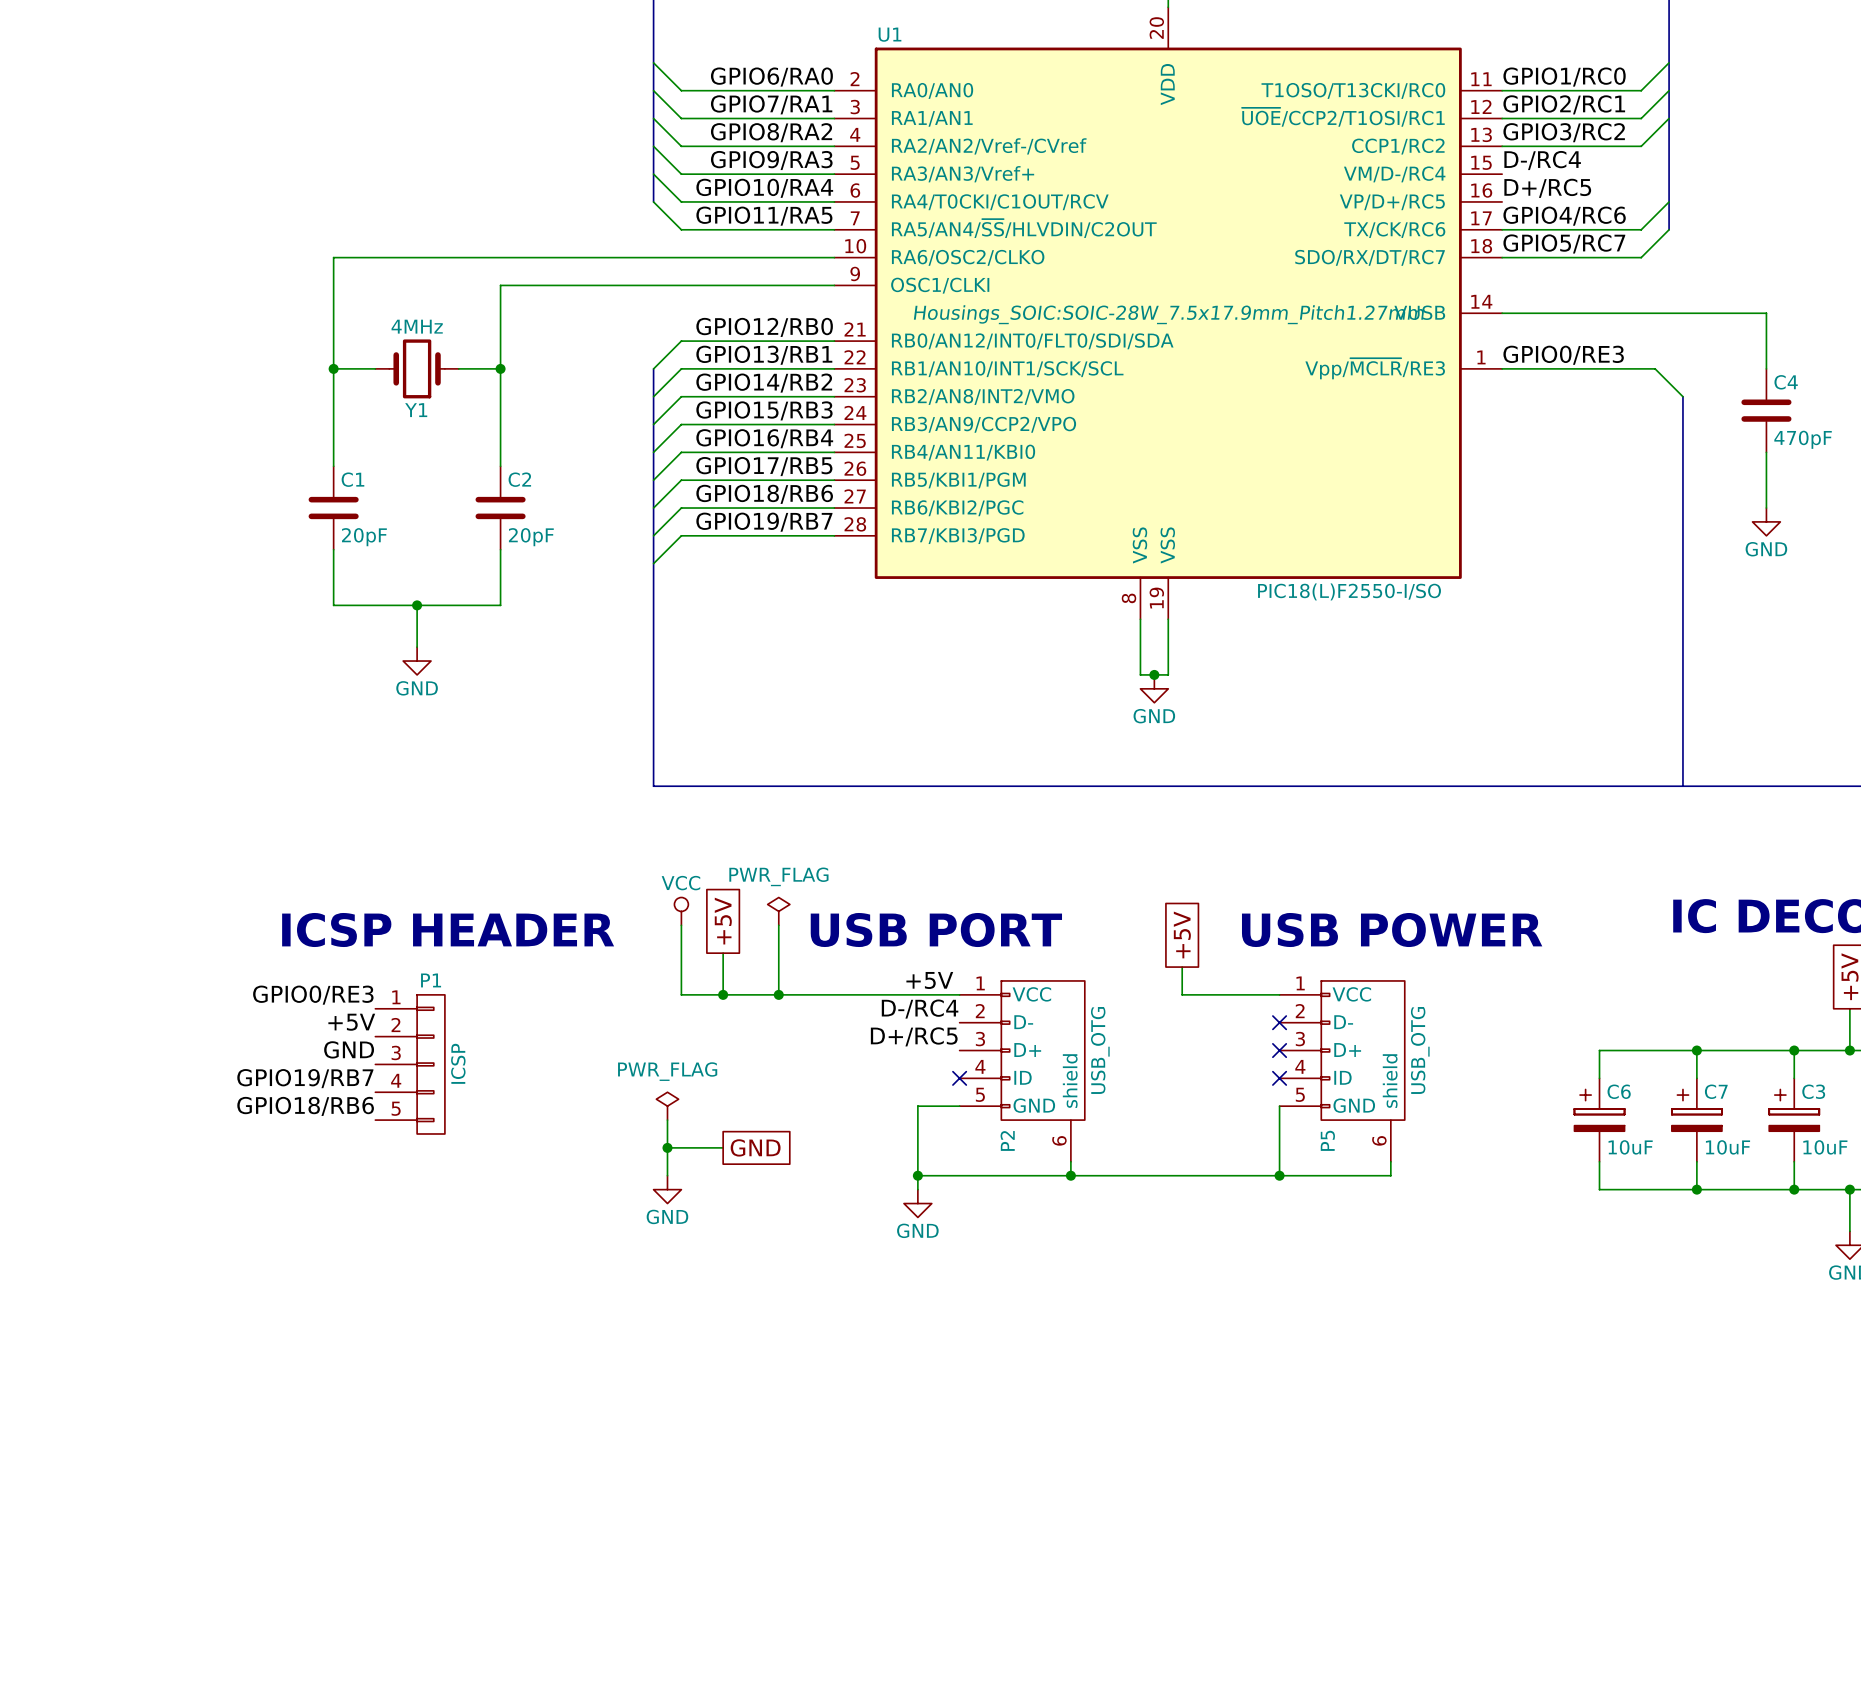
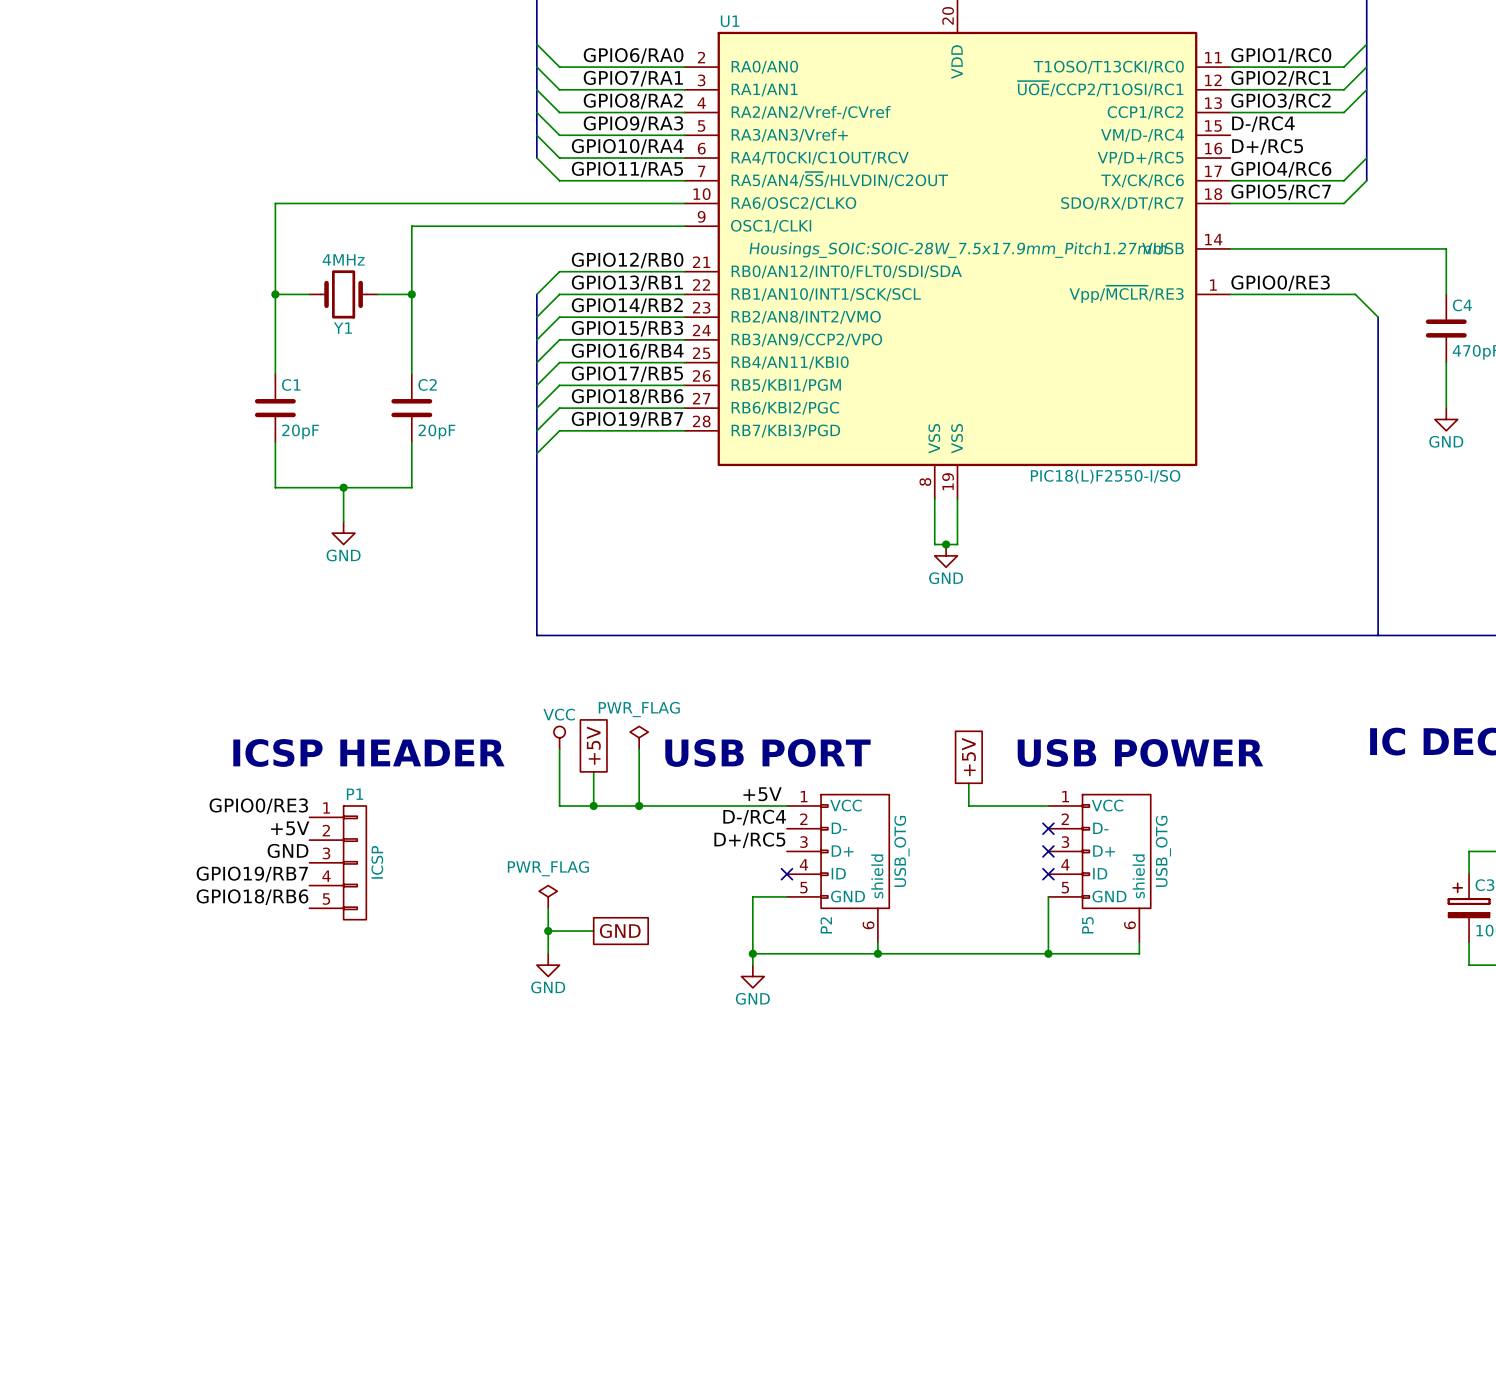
wire: (1696, 1050) (1696, 1078) -> none
junction: (1696, 1050) -> none
wire: (1794, 1050) (1599, 1050) (1599, 1078) -> none
junction: (1794, 1050) -> none
C6: 10uF (1599, 1120) -> none
C7: 10uF (1696, 1120) -> none
wire: (1599, 1161) (1599, 1189) (1794, 1189) -> none
wire: (1696, 1161) (1696, 1189) -> none
junction: (1696, 1189) -> none
junction: (1794, 1189) -> none

